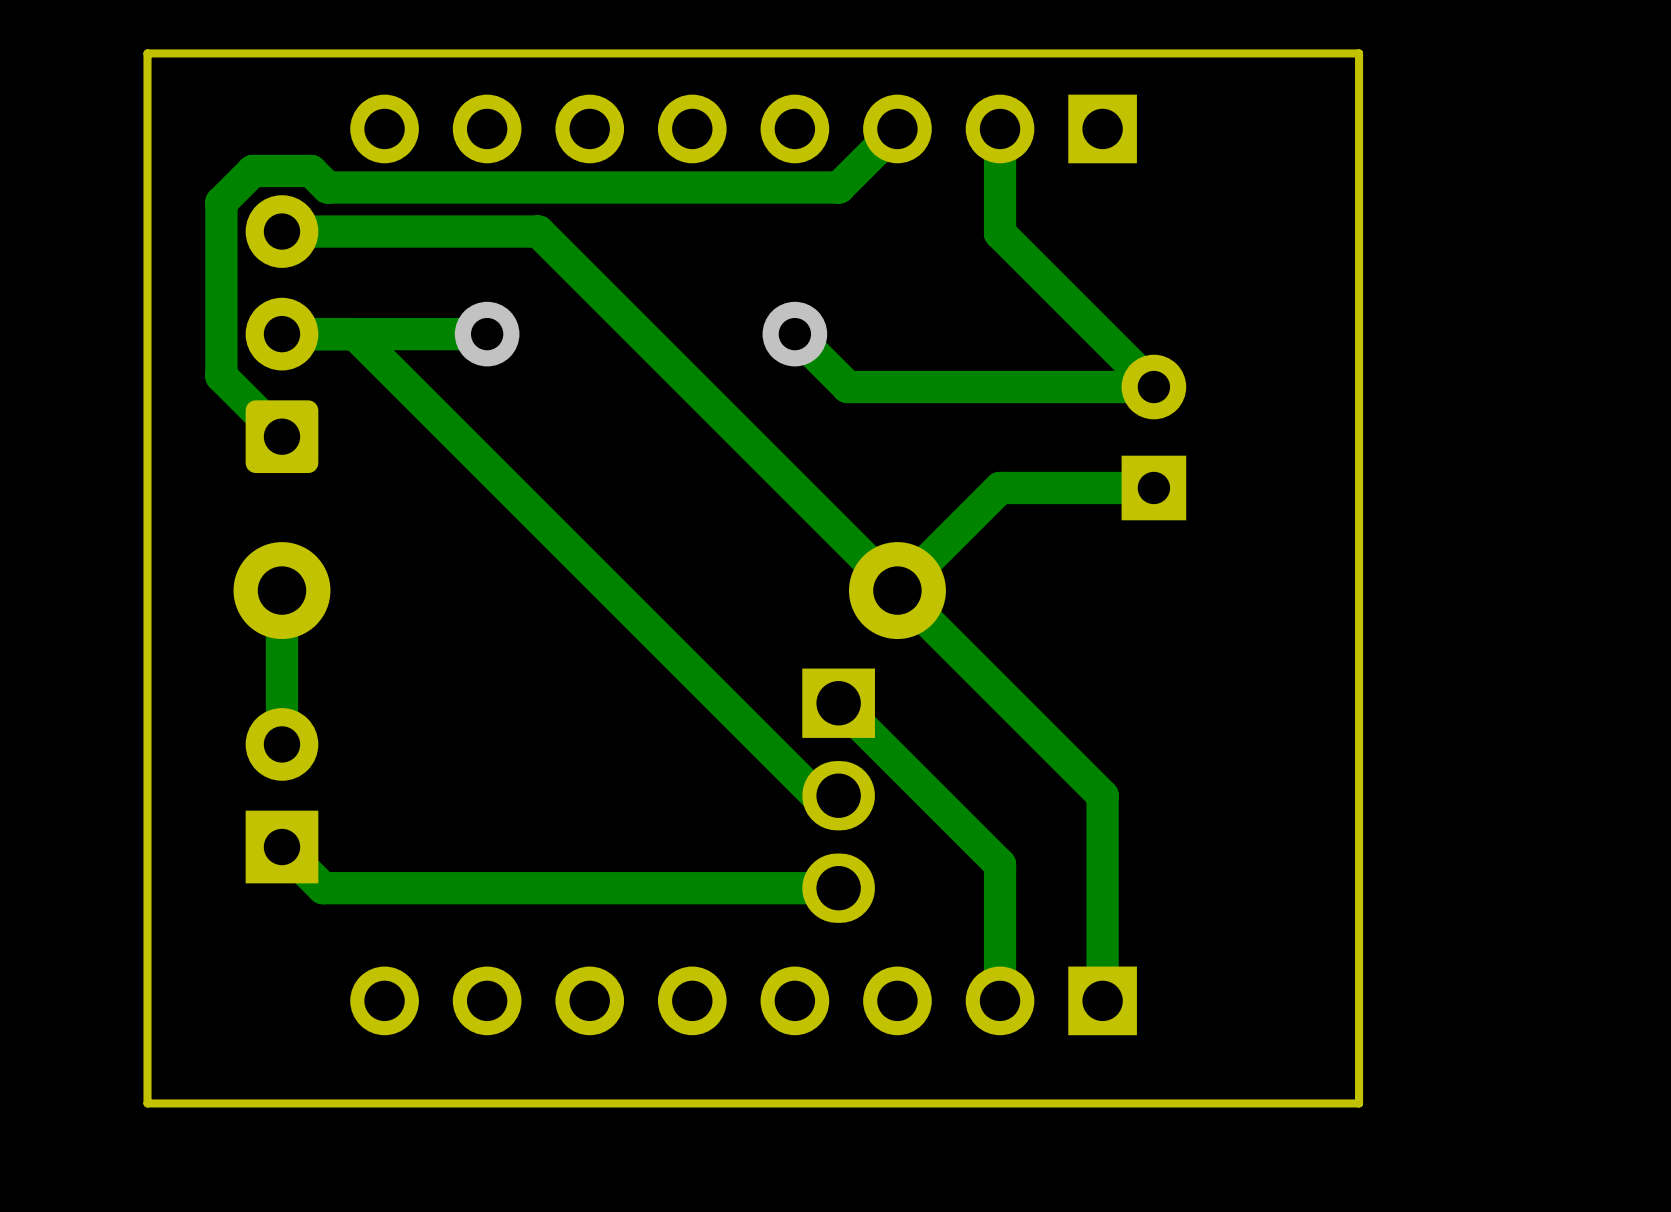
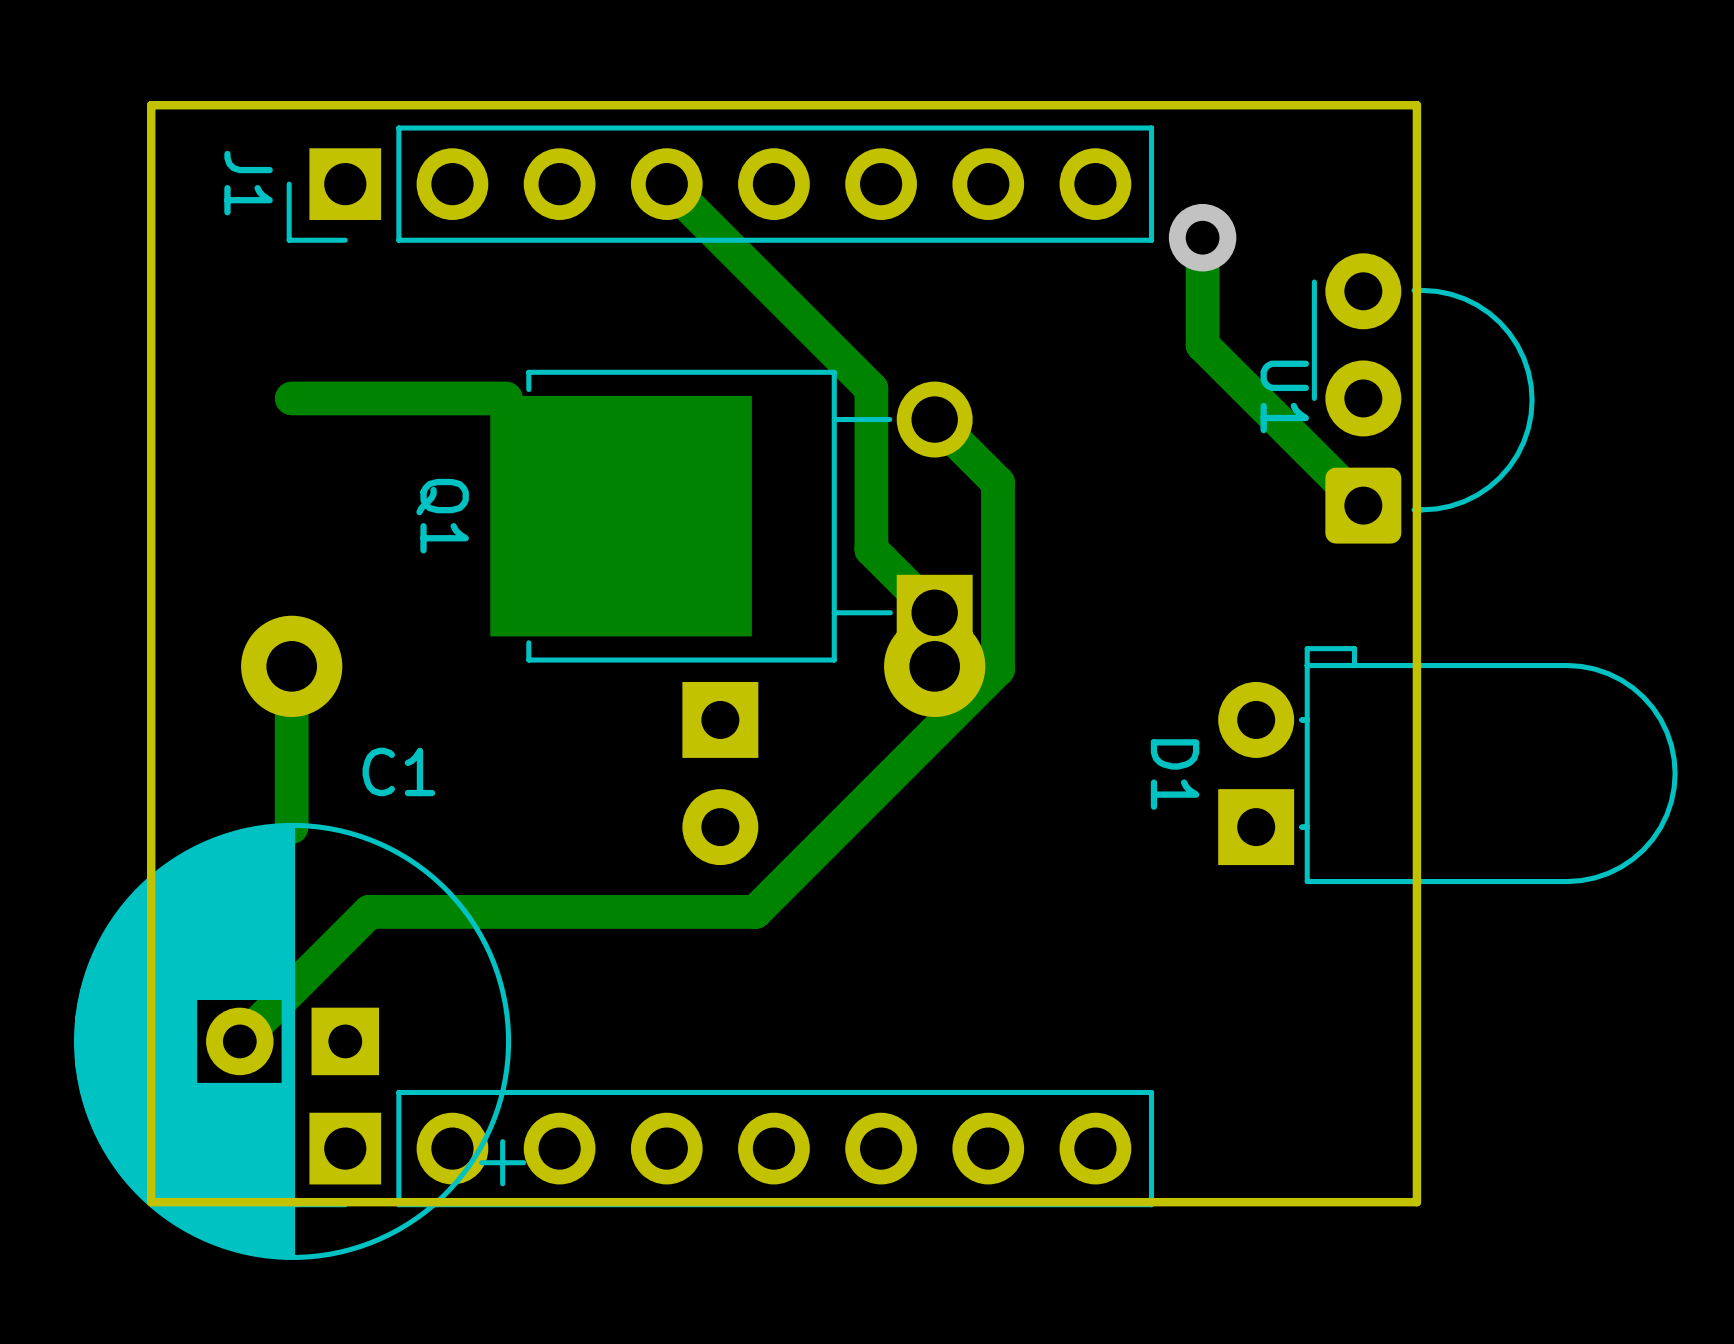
track: none -> (666, 184) (871, 388) (871, 549) (934, 612)
J1 side: top (743, 128) -> bottom (720, 184)
track: (897, 128) (838, 187) (327, 187) (311, 170) (252, 170) (221, 202) (221, 376) (281, 436) -> none
track: (1000, 128) (1000, 233) (1153, 387) (847, 387) (794, 334) -> none
track: none -> (1202, 237) (1202, 344) (1363, 505)
via: none -> (1202, 237)
track: (281, 231) (538, 231) (1102, 795) (1102, 1000) -> none
part: (281, 334) -> none
track: (354, 334) (816, 795) (838, 795) -> none
via: (487, 334) -> none
via: (794, 334) -> none
U1: none -> (1423, 398)
track: none -> (934, 419) (997, 482) (997, 669) (755, 911) (369, 911) (239, 1041)
C1 side: top (1153, 437) -> bottom (300, 1041)
Q1: none -> (731, 516)
track: (1153, 487) (1000, 487) (897, 590) -> none
D1: none -> (1447, 765)
track: (838, 703) (1000, 864) (1000, 1000) -> none
part rotation: 0° (281, 795) -> 180° (720, 773)
part position: (281, 795) -> (720, 773)
part: (838, 795) -> none
track: (281, 847) (323, 888) (838, 888) -> none
part side: top (743, 1000) -> bottom (720, 1148)

